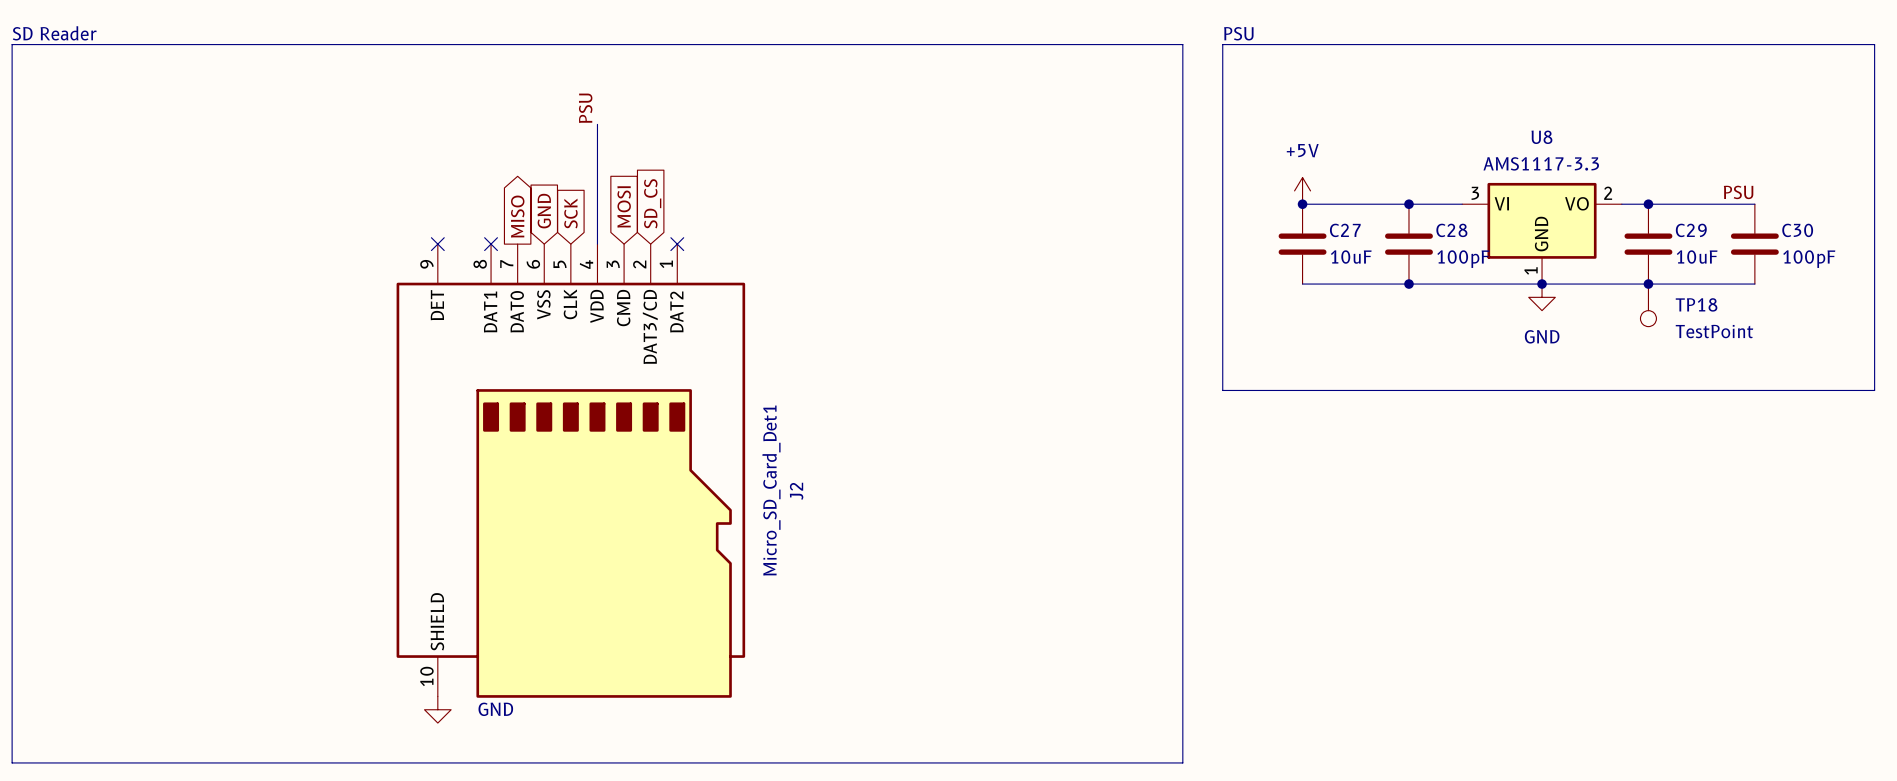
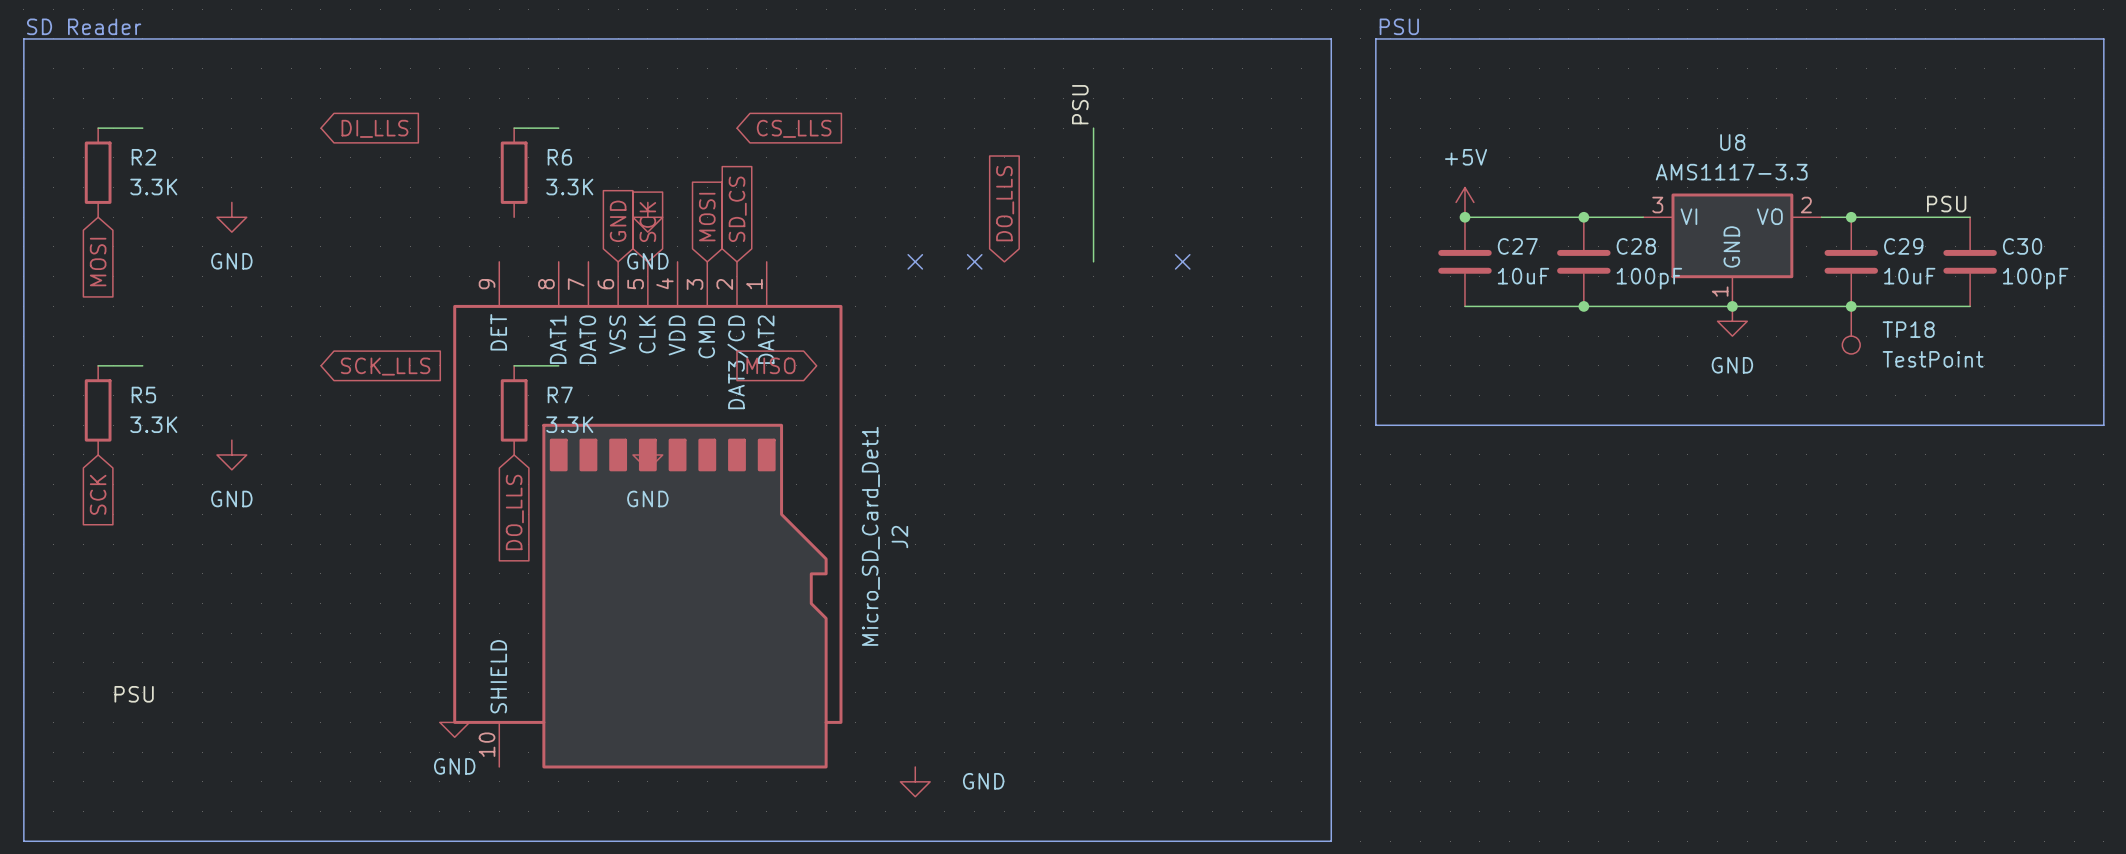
label: PSU (585, 108) -> none
label: none -> PSU (1080, 104)
wire: none -> (98, 128) (142, 128)
wire: none -> (514, 128) (558, 128)
wire: (597, 124) (597, 244) -> none
wire: none -> (1093, 128) (1093, 261)
global label: none -> DI_LLS (374, 128)
global label: none -> CS_LLS (794, 128)
R2: none -> 3.3K (98, 172)
R6: none -> 3.3K (514, 172)
global label: none -> DO_LLS (1005, 203)
power symbol: none -> GND (231, 217)
power symbol: none -> GND (647, 217)
global label rotation: 0° (517, 216) -> 90° clockwise (770, 365)
global label position: MISO (517, 216) -> MISO (770, 365)
global label: none -> MOSI (98, 262)
no-connect mark: (437, 244) -> none
no-connect mark: (491, 244) -> none
no-connect mark: (677, 244) -> none
no-connect mark: none -> (915, 261)
no-connect mark: none -> (974, 261)
no-connect mark: none -> (1182, 261)
wire: none -> (98, 365) (142, 365)
wire: none -> (514, 365) (558, 365)
global label: none -> SCK_LLS (385, 366)
R5: none -> 3.3K (98, 410)
R7: none -> 3.3K (514, 410)
power symbol: none -> GND (231, 454)
power symbol: none -> GND (647, 454)
global label: none -> SCK (98, 494)
global label: none -> DO_LLS (514, 512)
label: none -> PSU (134, 694)
power symbol position: GND (437, 709) -> GND (454, 722)
power symbol text position: GND (495, 709) -> GND (454, 766)
power symbol: none -> GND (915, 781)

